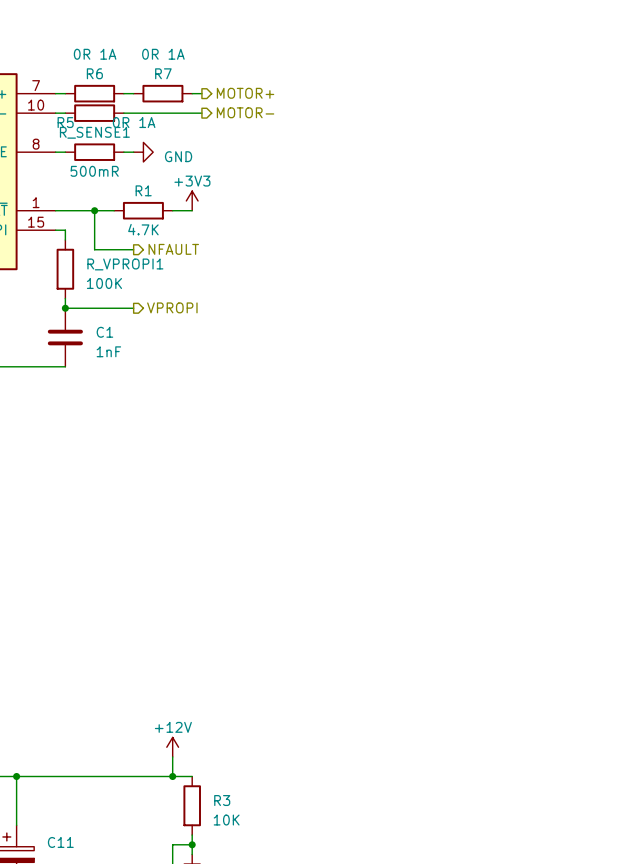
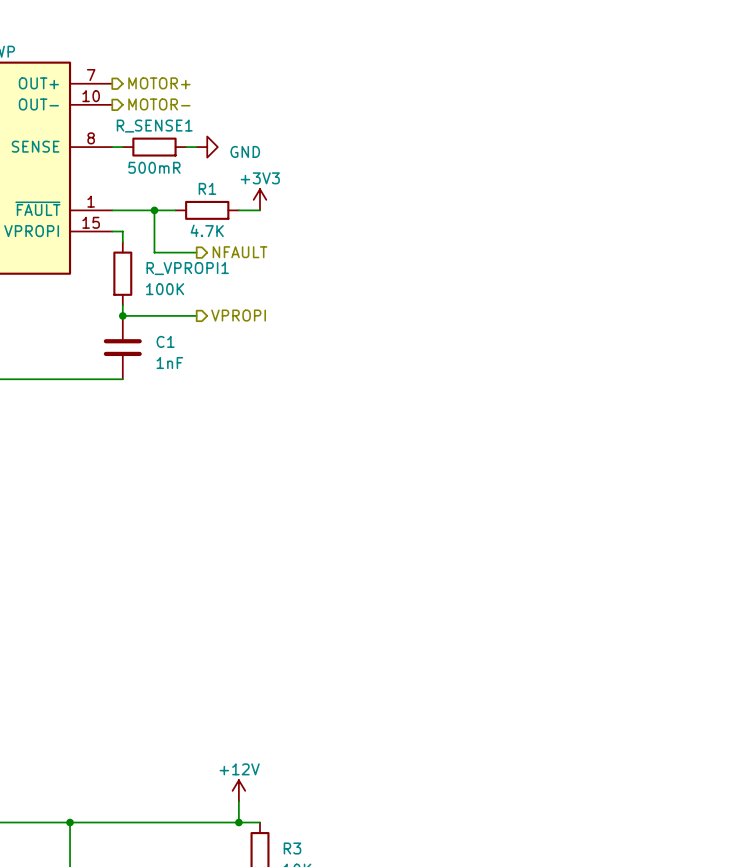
wire: (55, 93) (65, 93) -> none
R6: 0R 1A (94, 93) -> none
wire: (123, 93) (133, 93) -> none
R7: 0R 1A (162, 93) -> none
wire: (192, 93) (201, 93) -> none
hierarchical label position: MOTOR+ (245, 93) -> MOTOR+ (159, 83)
hierarchical label position: MOTOR- (245, 112) -> MOTOR- (159, 104)
wire: (55, 113) (65, 113) -> none
R5: 0R 1A (94, 113) -> none
wire: (123, 113) (201, 113) -> none

